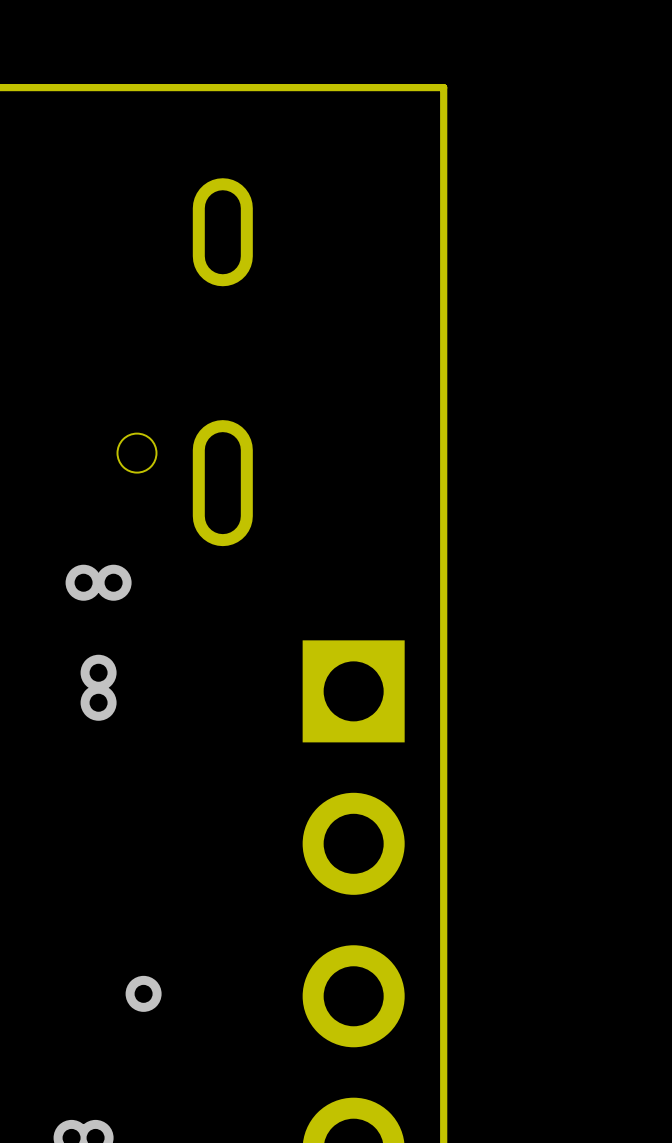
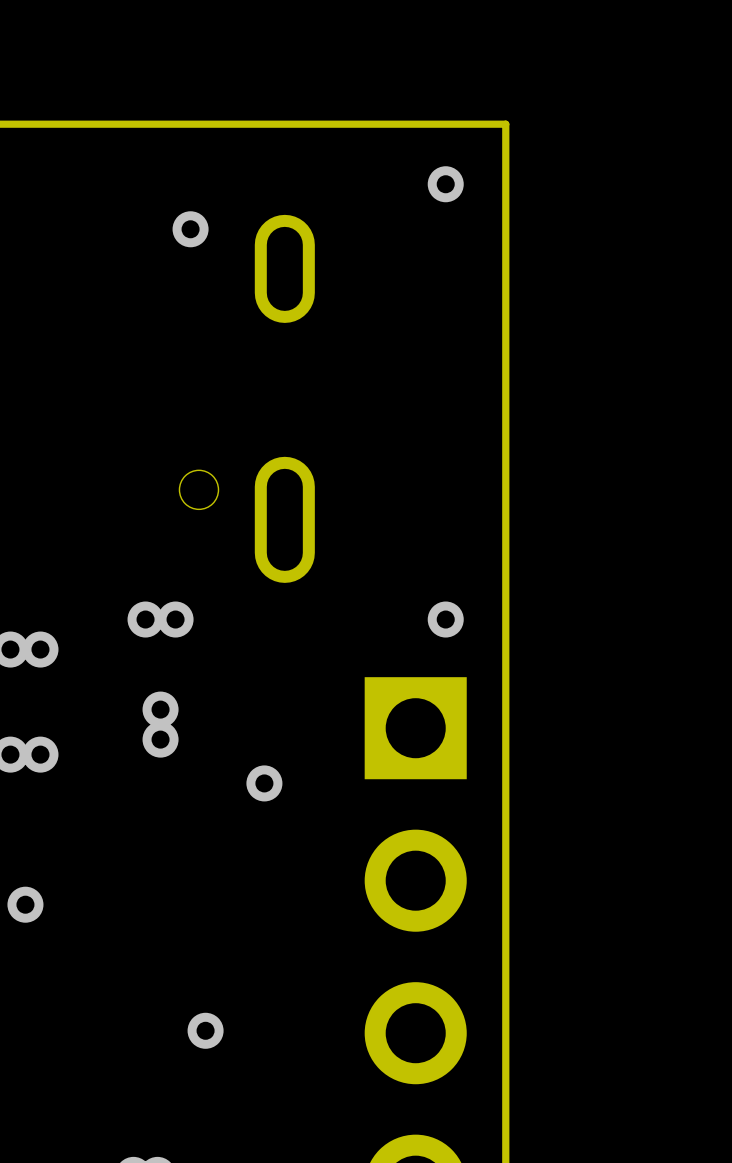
via: none -> (445, 184)
via: none -> (190, 229)
via: none -> (445, 619)
via: none -> (264, 783)

